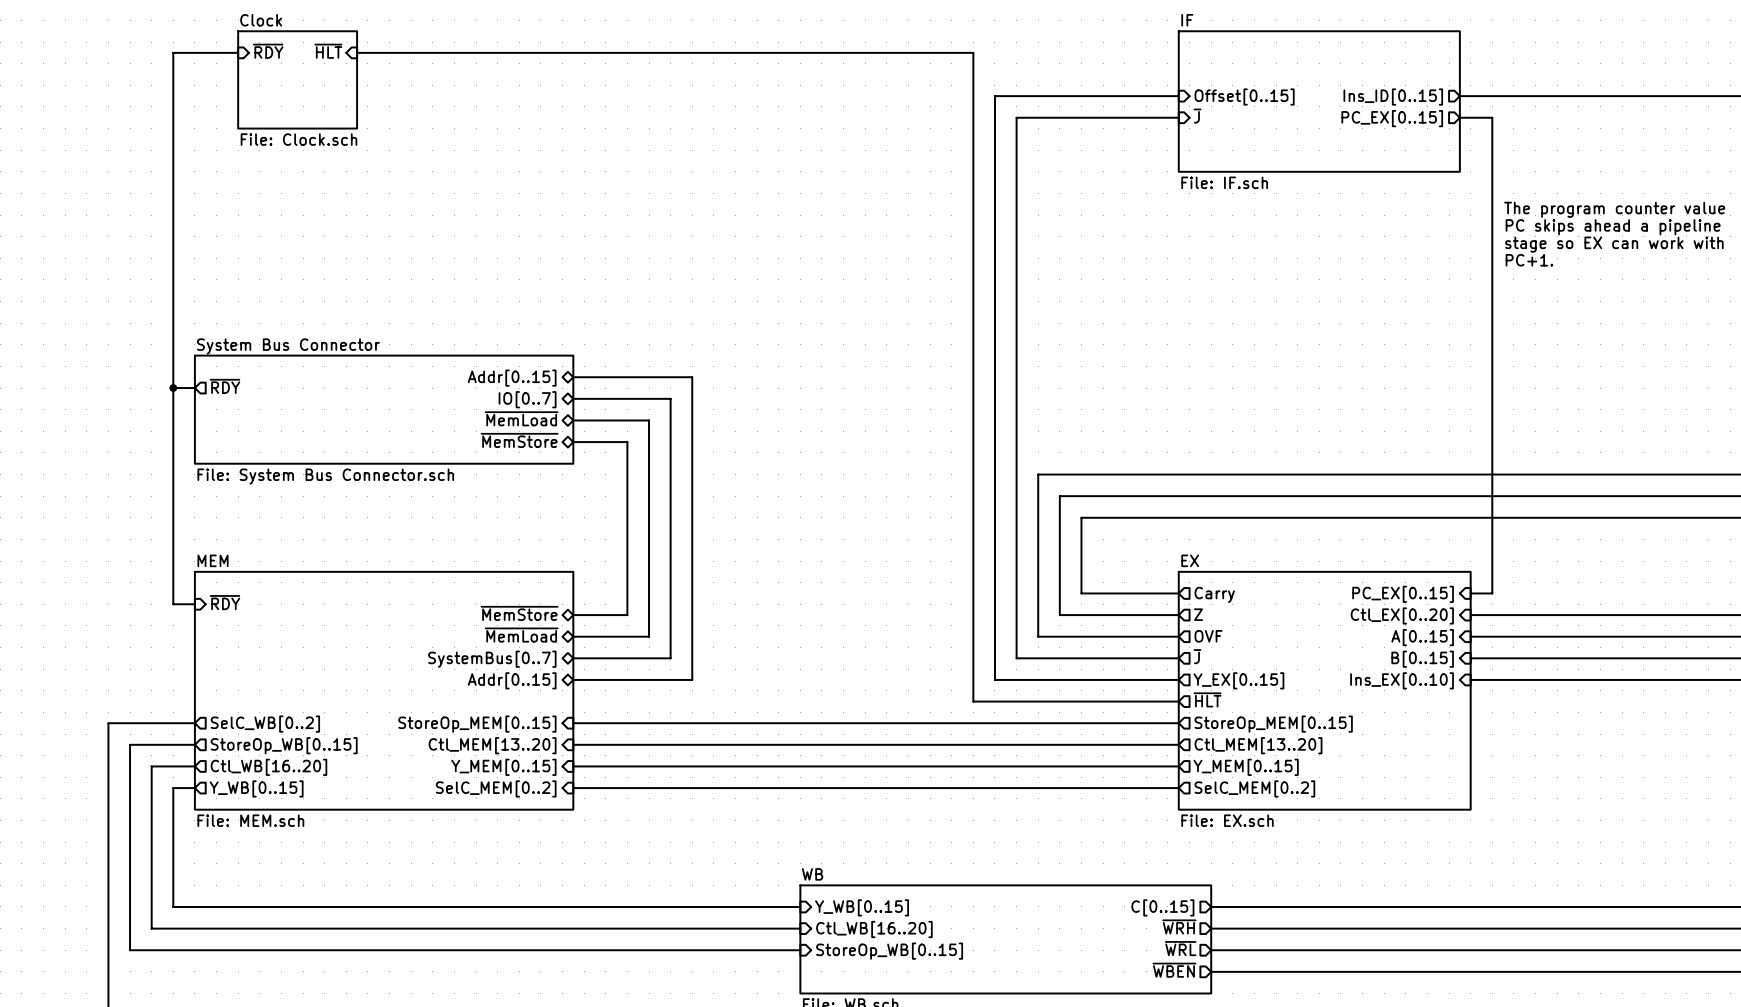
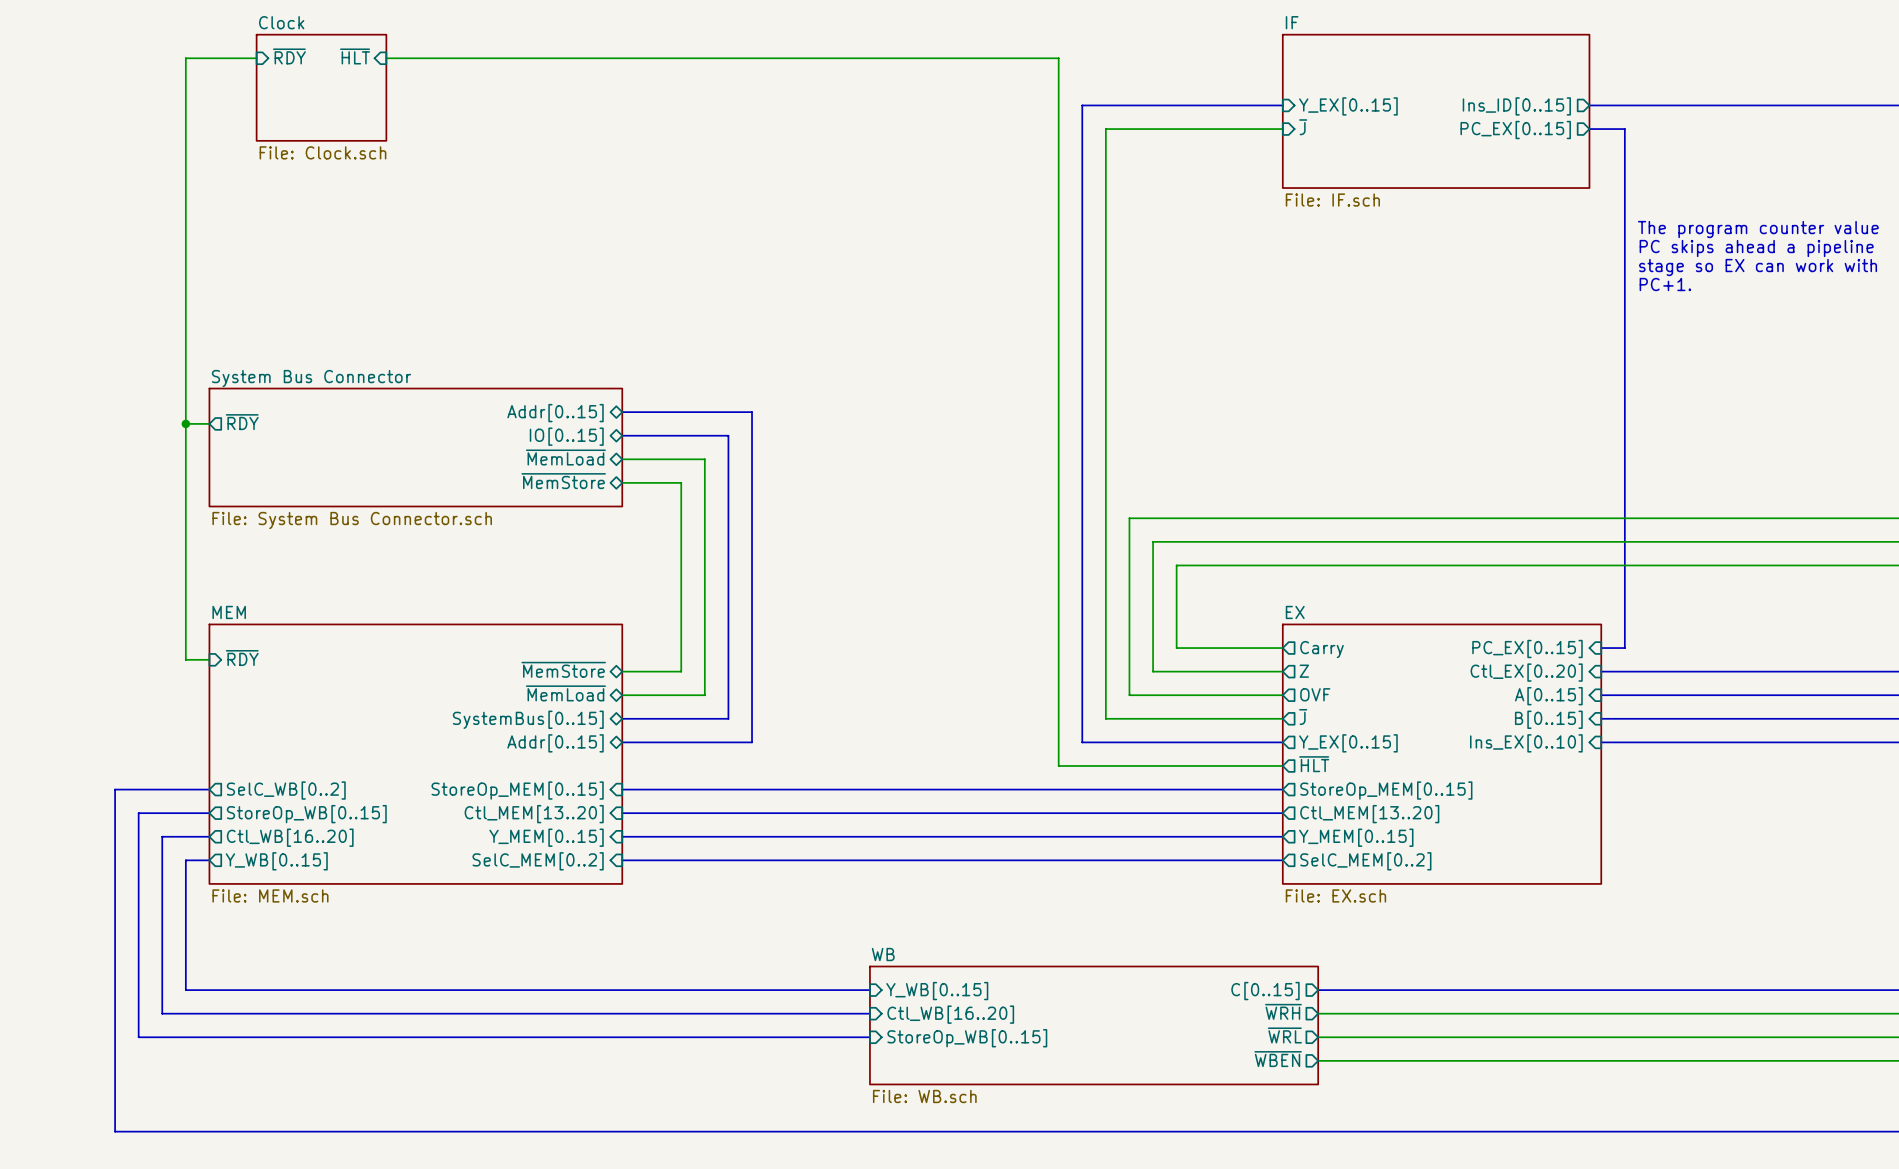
sheet pin: Offset[0..15] (1244, 97) -> Y_EX[0..15] (1348, 106)
sheet pin: IO[0..7] (527, 399) -> IO[0..15] (566, 436)
sheet pin: SystemBus[0..7] (492, 659) -> SystemBus[0..15] (528, 719)

